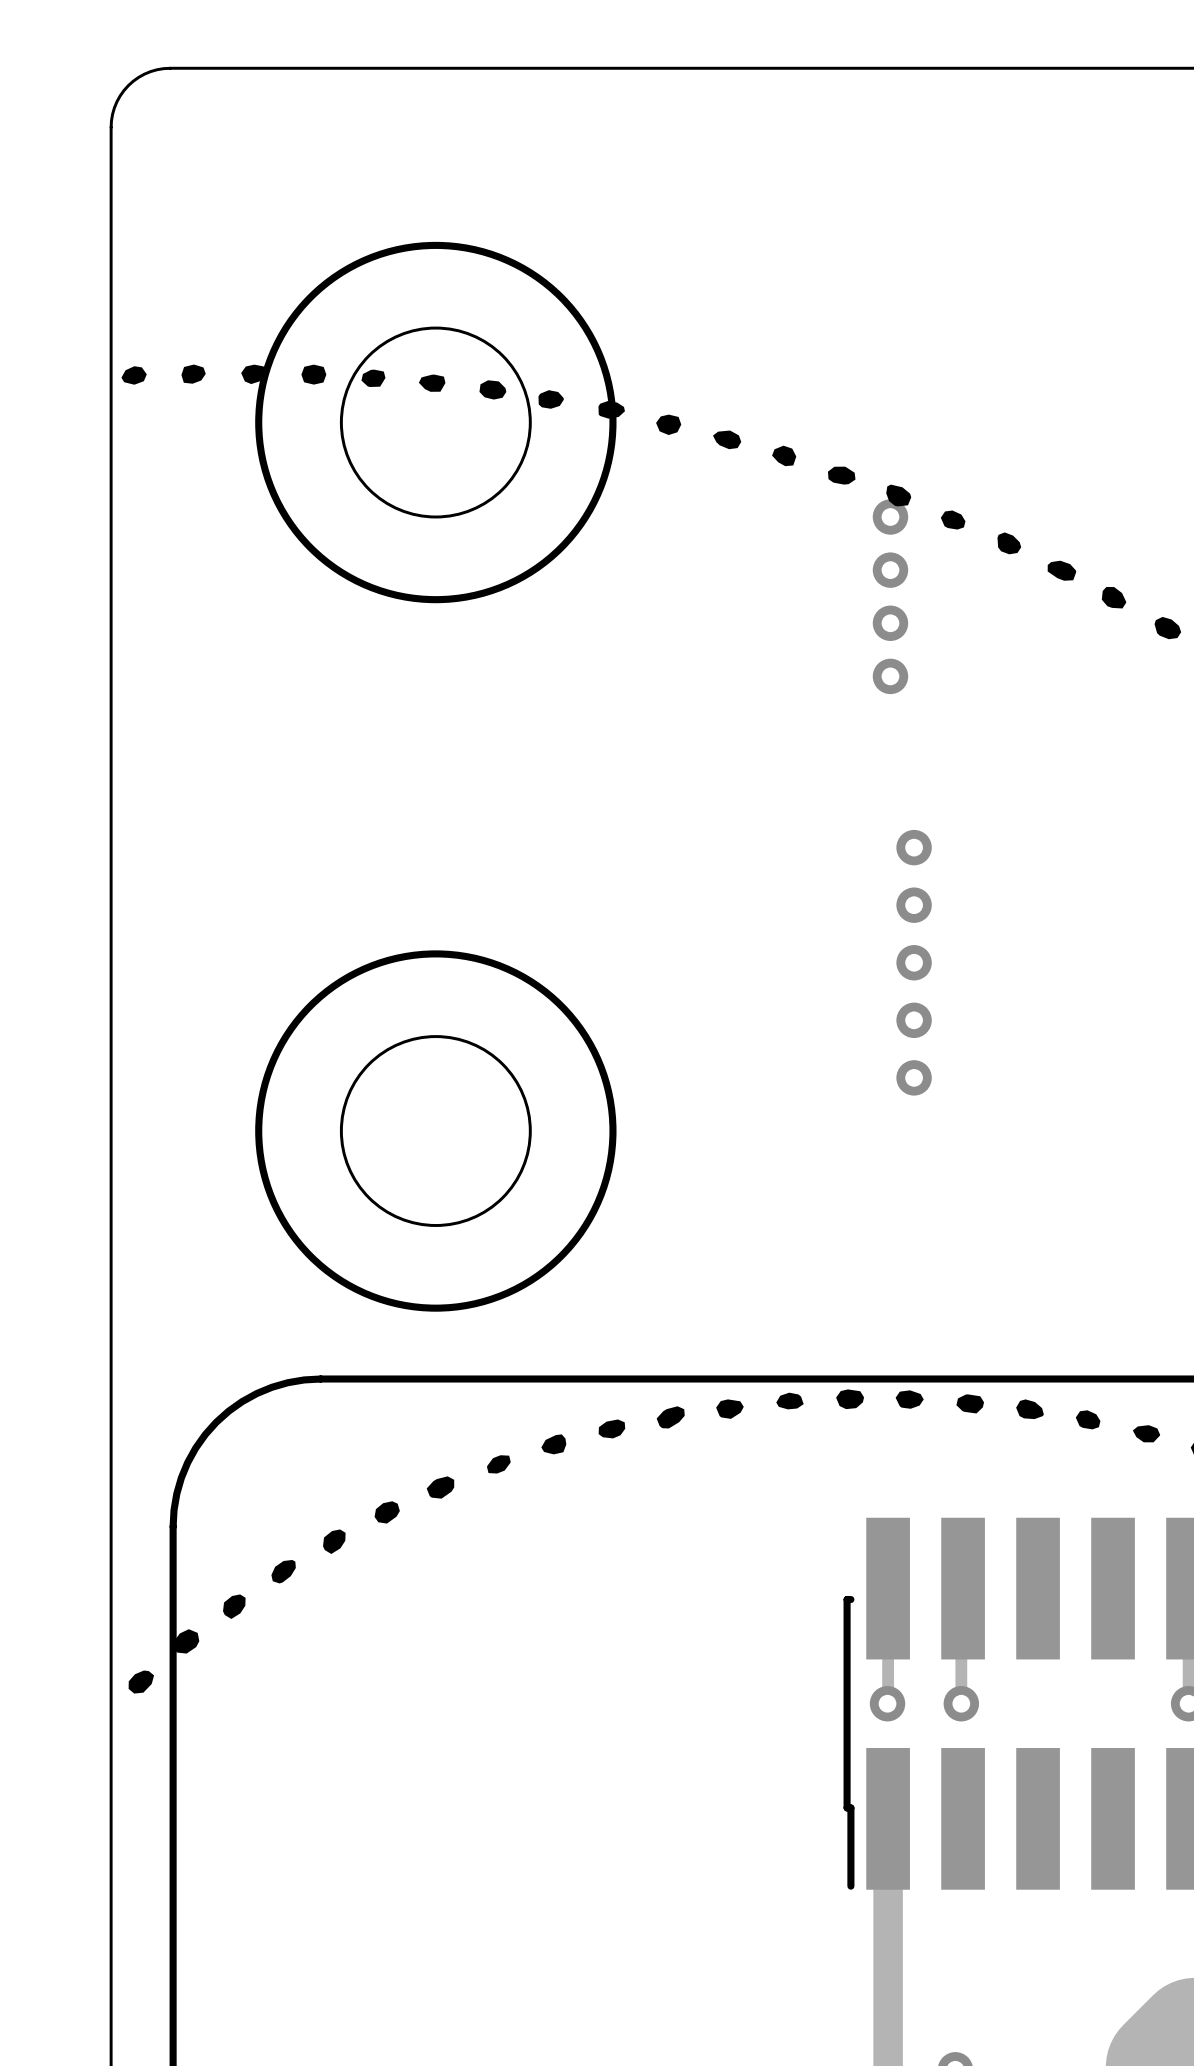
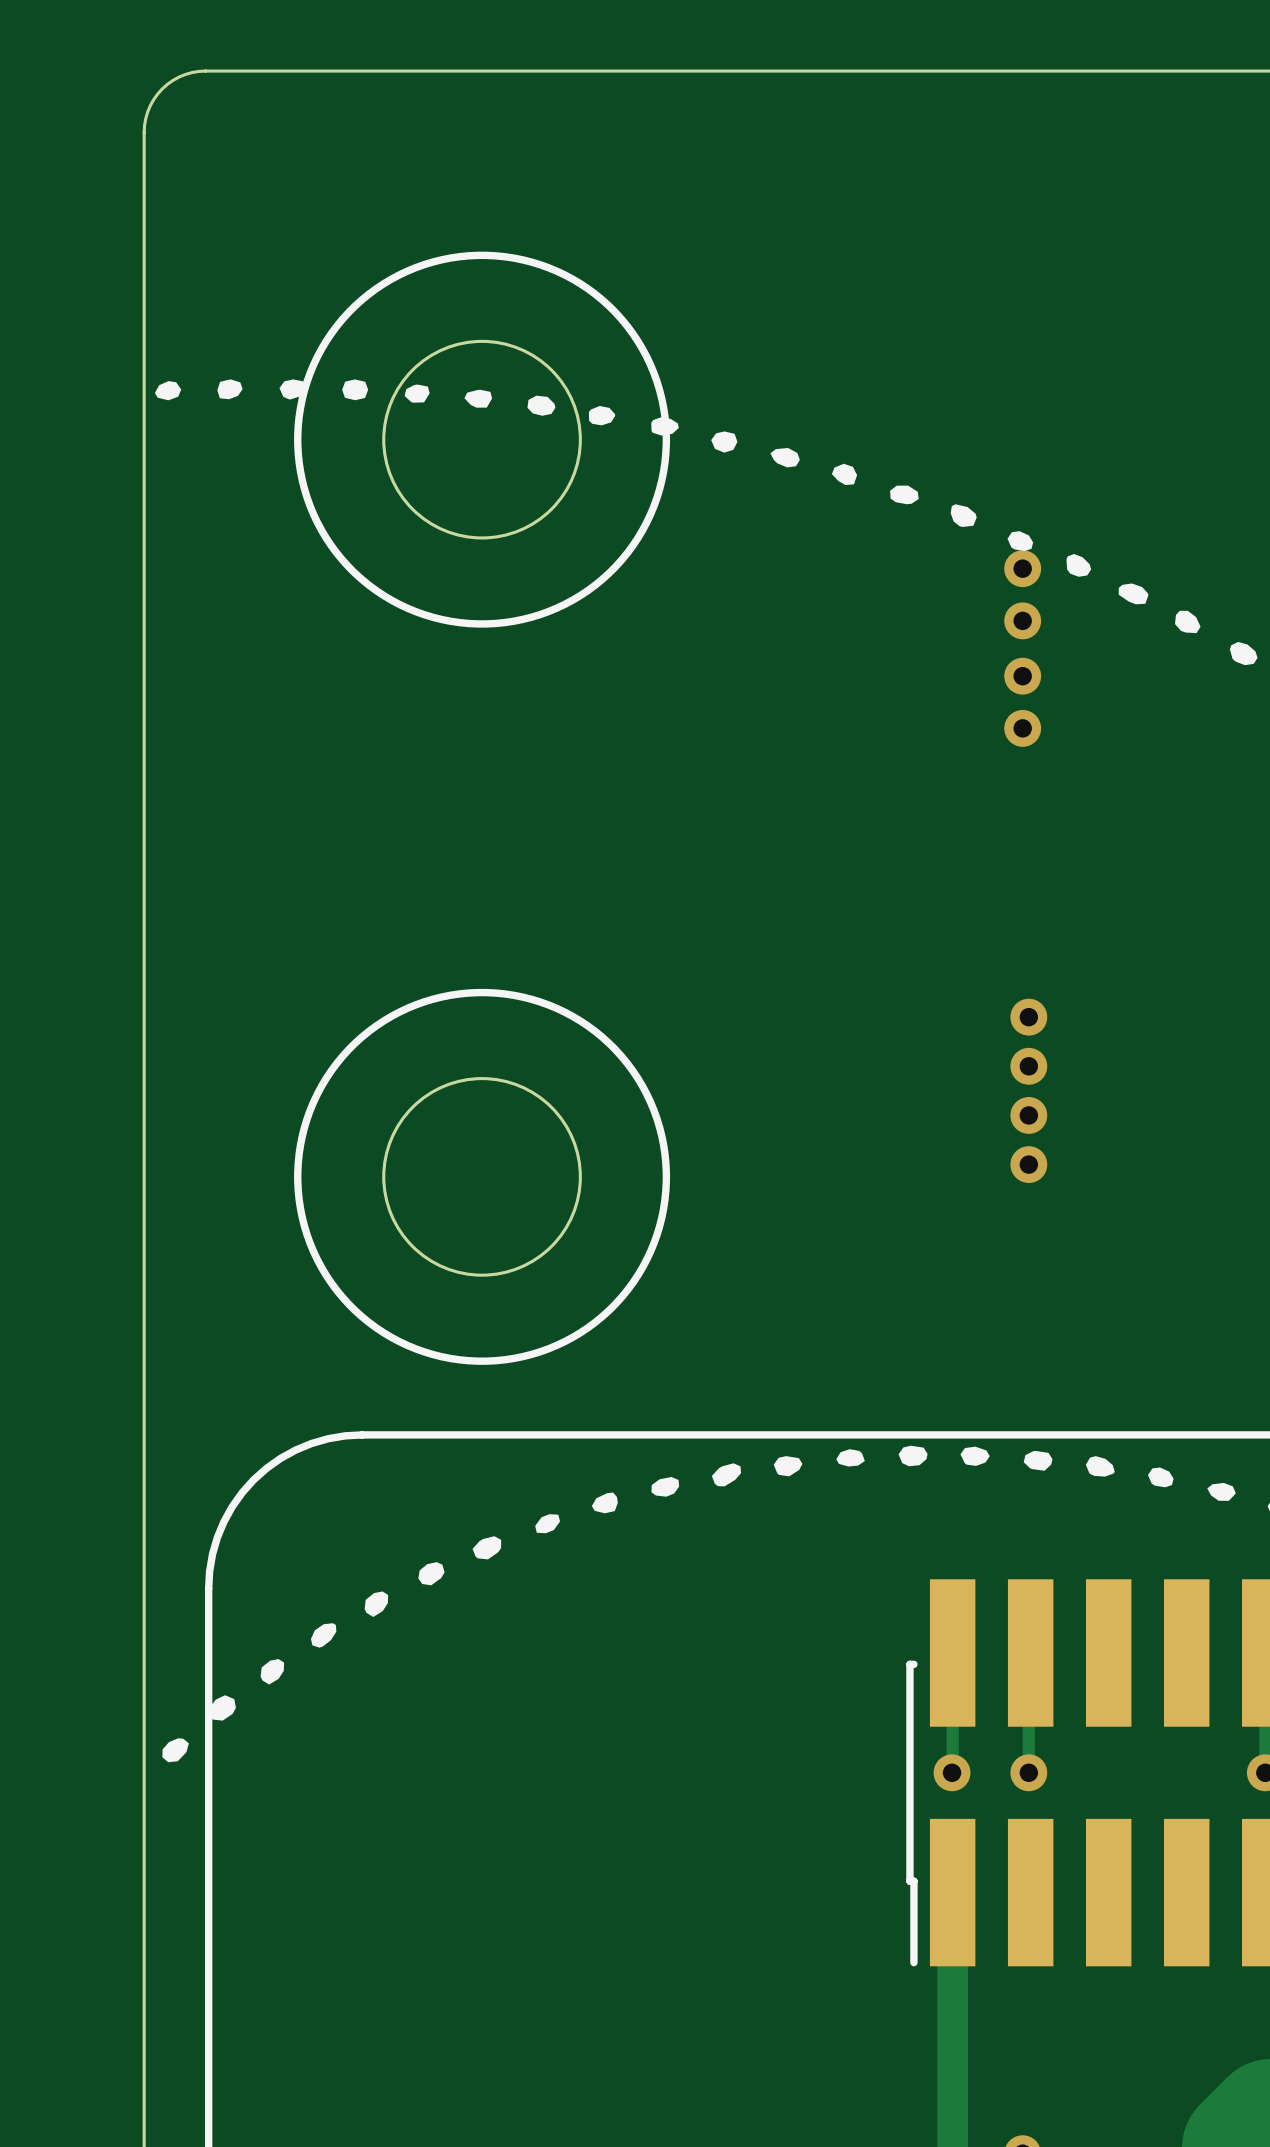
via: (890, 516) -> none
via: none -> (1022, 568)
via: (890, 570) -> none
via: none -> (1022, 620)
via: (890, 623) -> none
via: none -> (1022, 676)
via: (890, 676) -> none
via: none -> (1022, 728)
via: (914, 847) -> none
via: (914, 905) -> none
via: (914, 962) -> none
via: none -> (1028, 1017)
via: (914, 1020) -> none
via: none -> (1028, 1066)
via: none -> (1028, 1115)
via: (914, 1077) -> none
via: none -> (1028, 1164)

